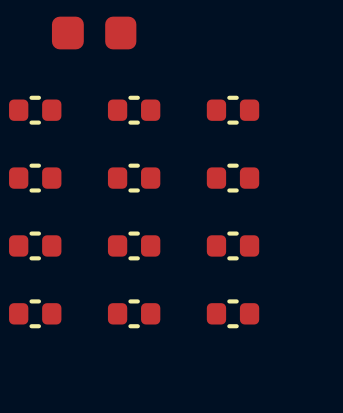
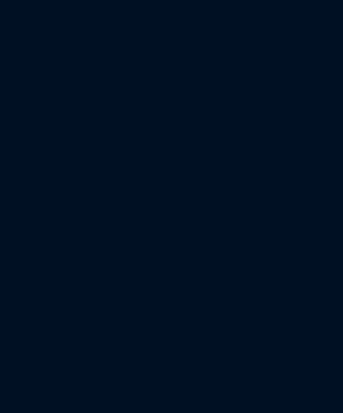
part: (94, 33) -> none
part: (35, 110) -> none
part: (134, 110) -> none
part: (233, 110) -> none
part: (35, 178) -> none
part: (134, 178) -> none
part: (233, 178) -> none
part: (35, 245) -> none
part: (134, 245) -> none
part: (233, 245) -> none
part: (35, 313) -> none
part: (134, 313) -> none
part: (233, 313) -> none

